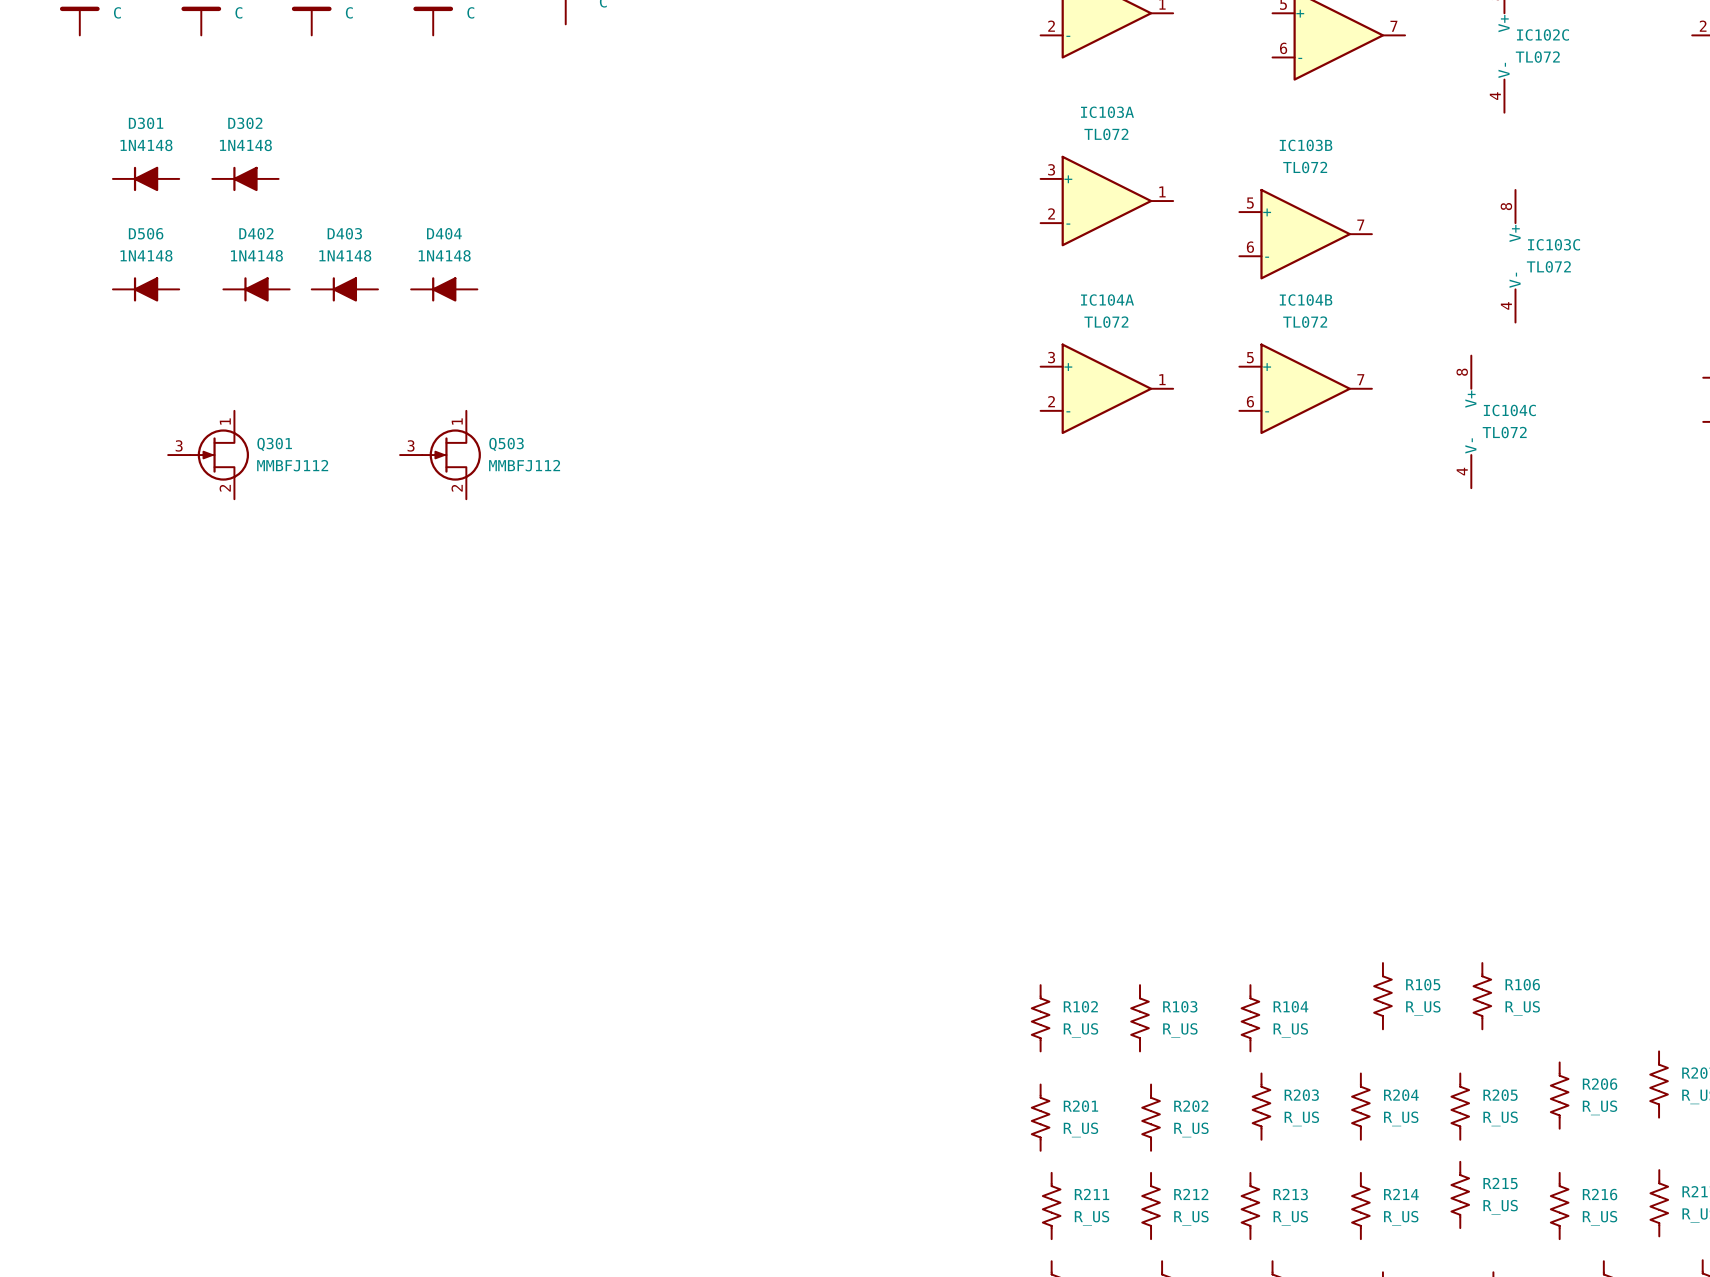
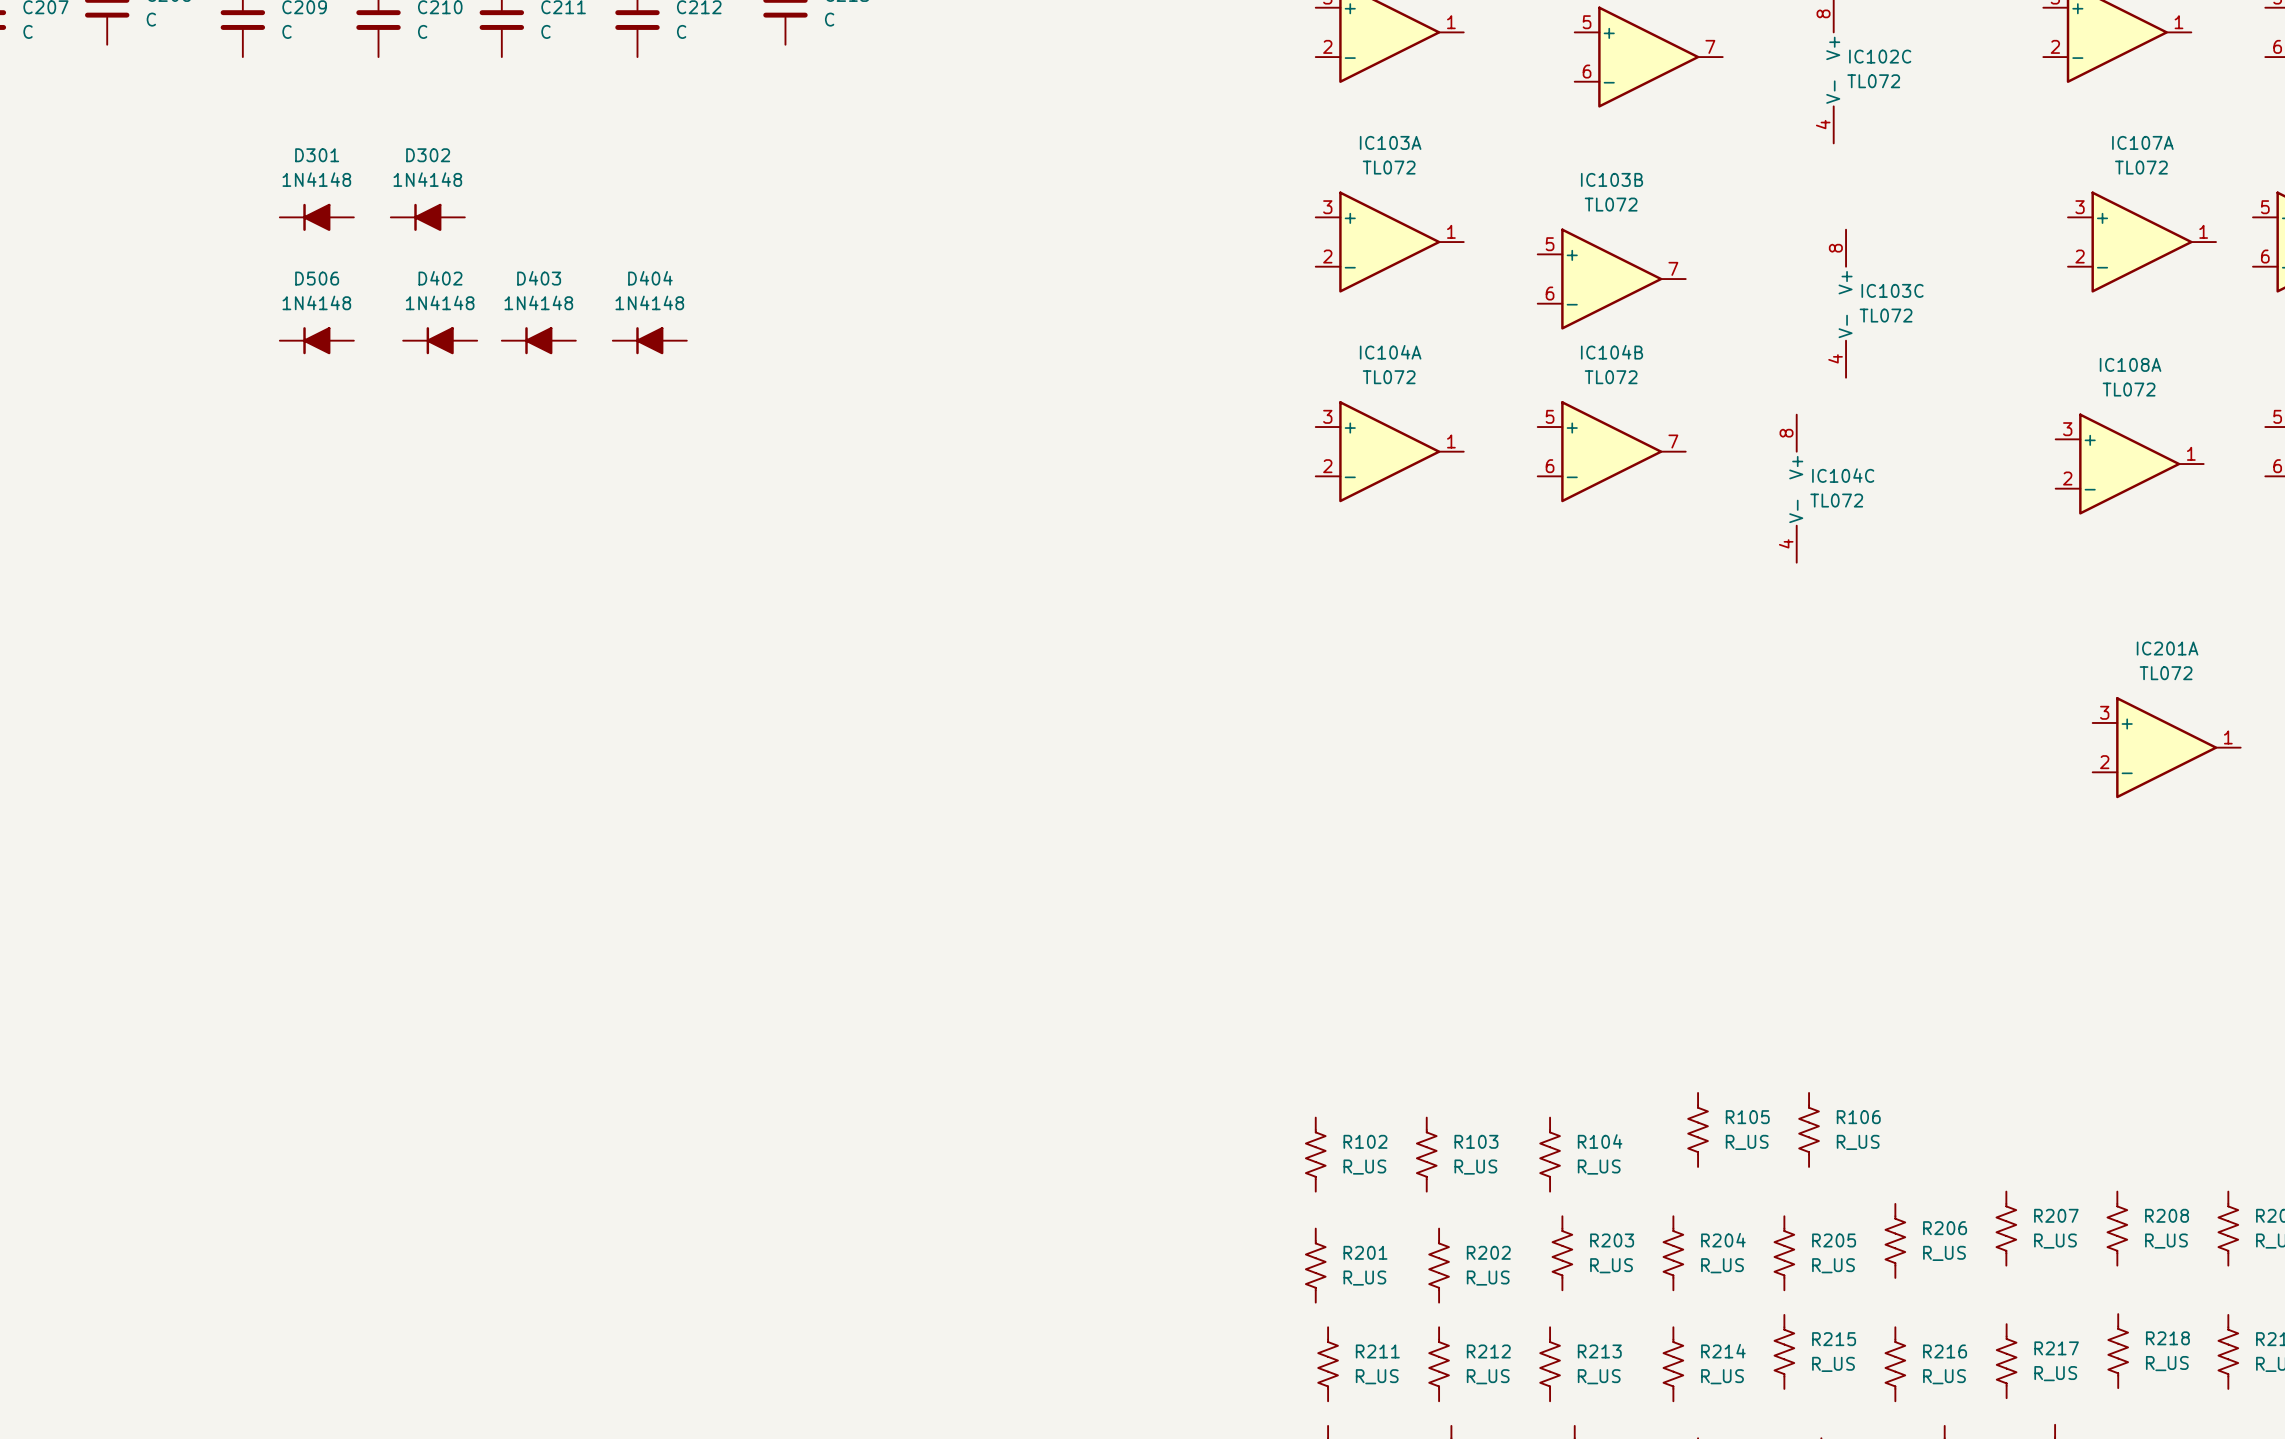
Q301: MMBFJ112 (208, 455) -> none
Q503: MMBFJ112 (440, 455) -> none

